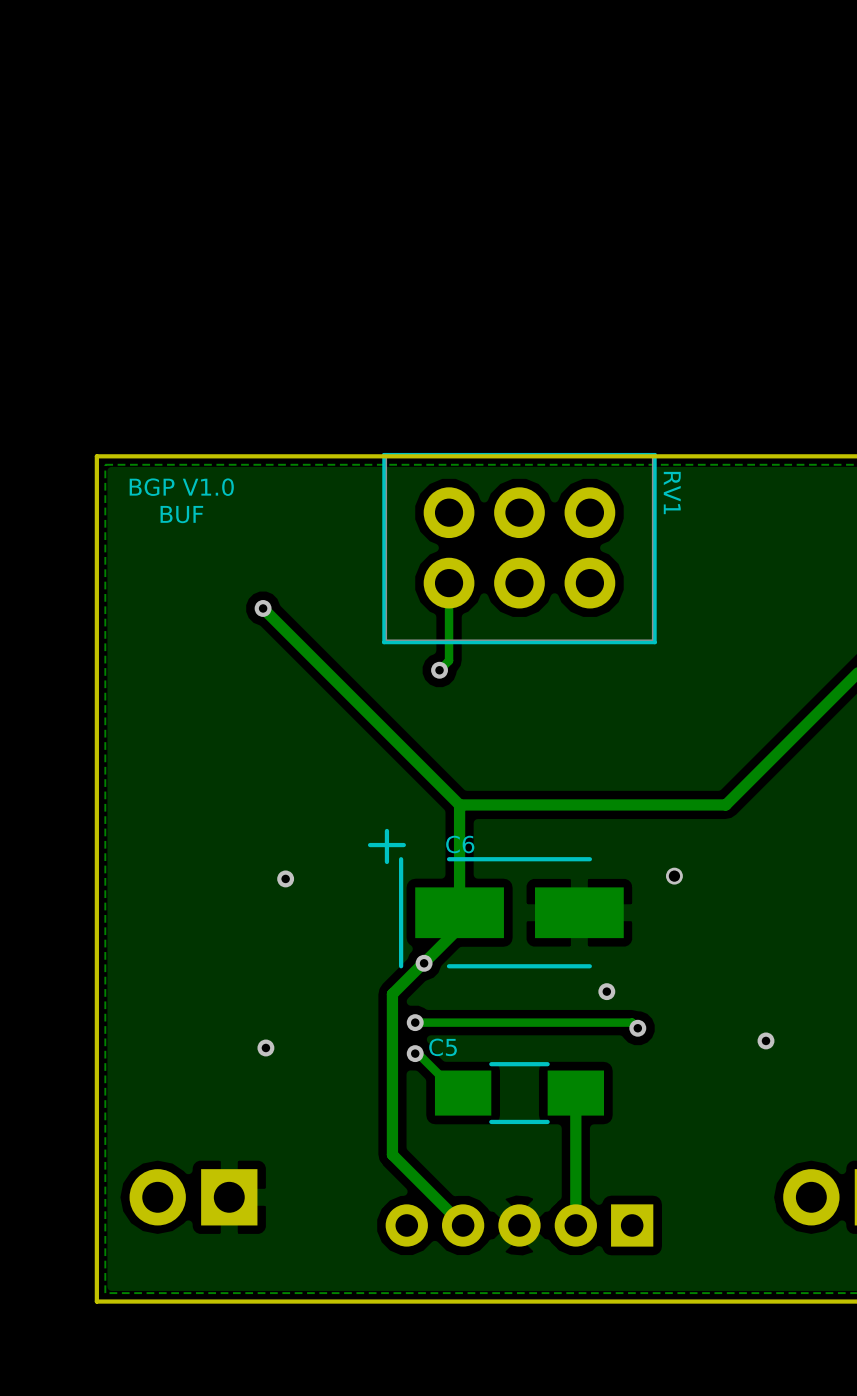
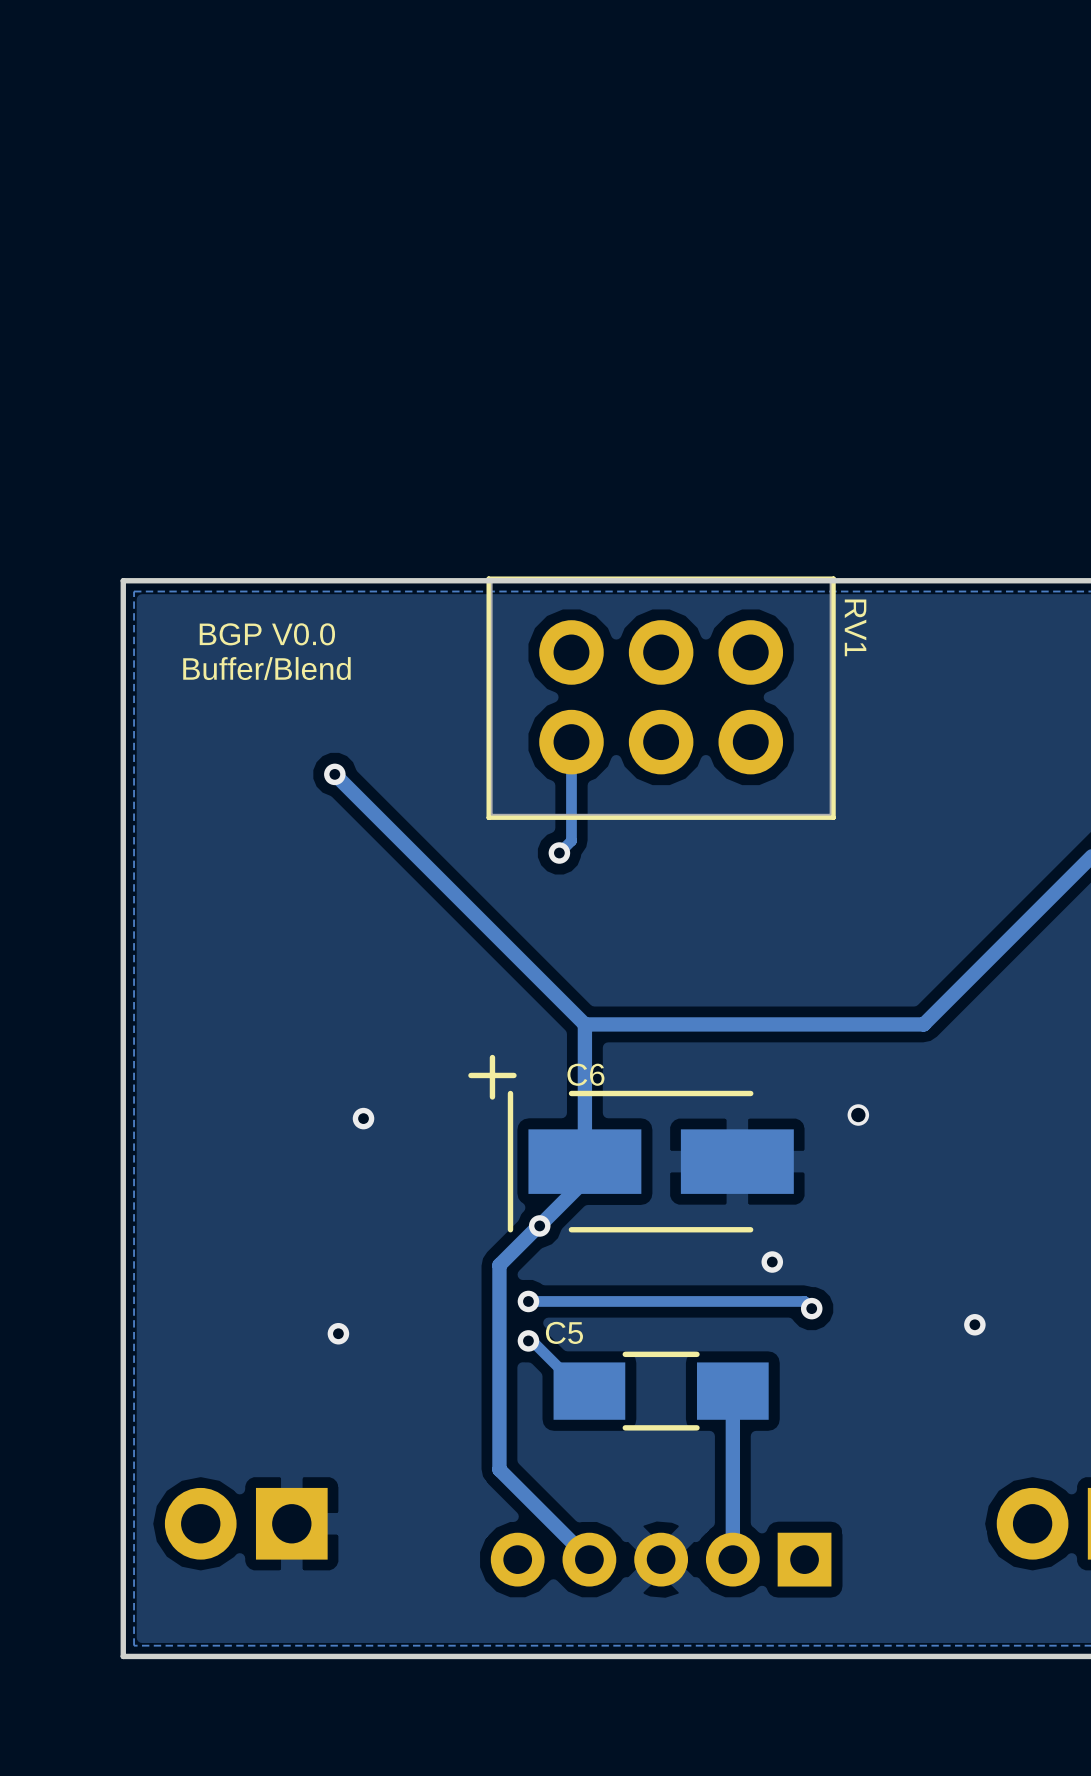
text: BGP V1.0 (181, 487) -> BGP V0.0 (267, 634)
text: BUF (181, 514) -> none
text: none -> Buffer/Blend (266, 668)

